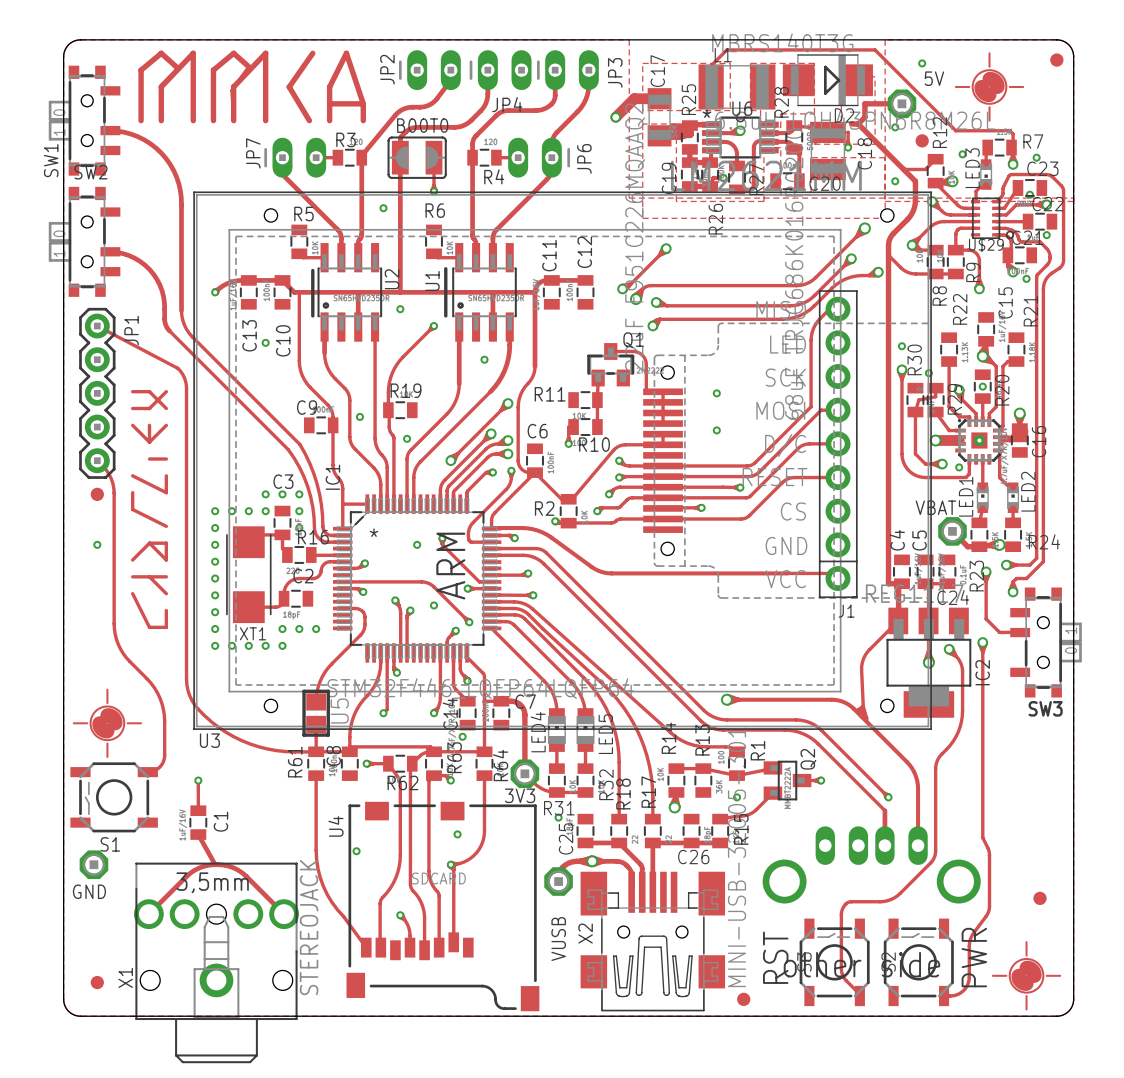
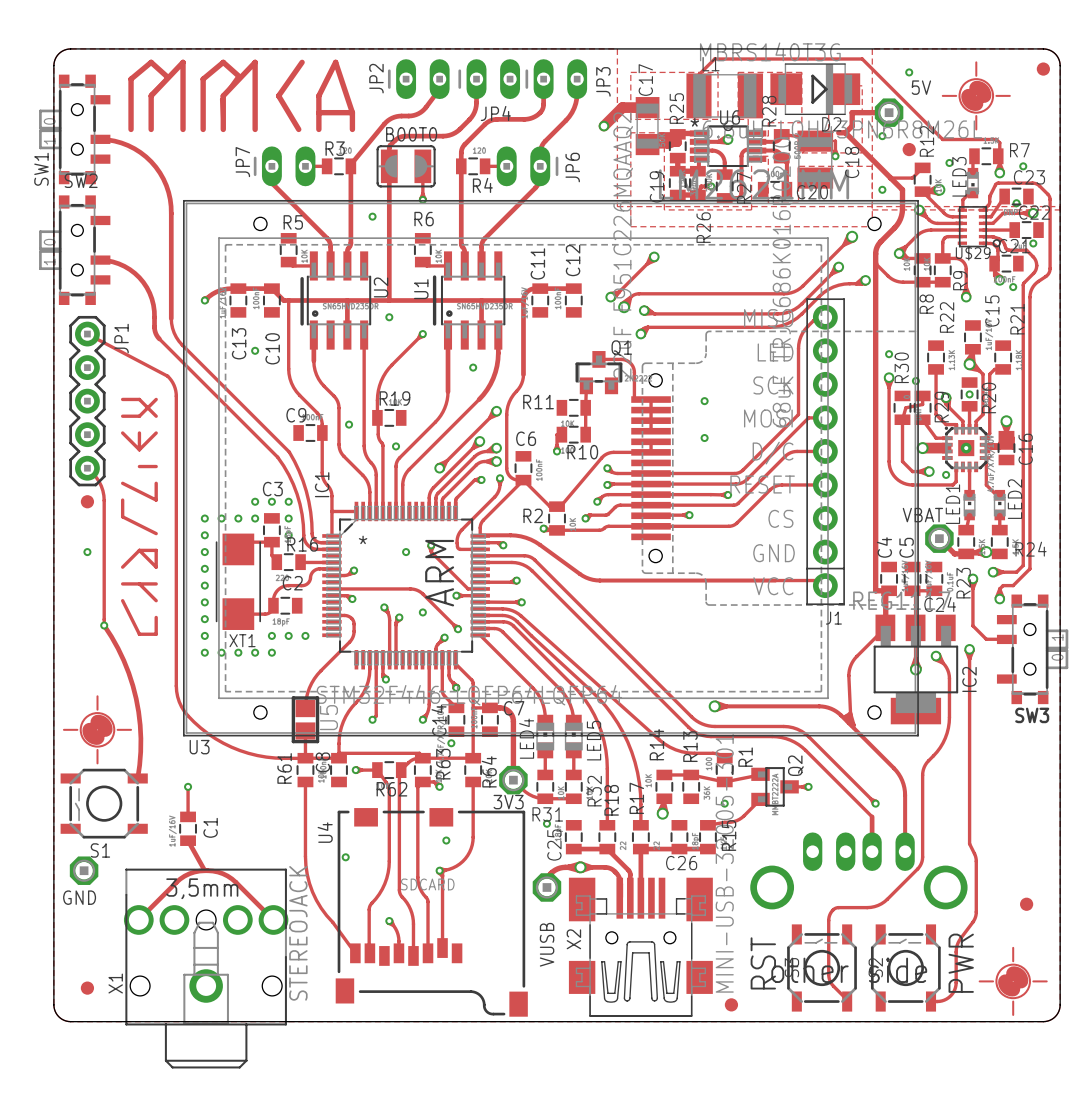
track: (114, 618) (115, 634) (120, 648) (154, 687) (163, 709) (164, 759) (158, 768) (147, 772) -> (104, 625) (123, 660) (136, 698) (140, 738) (137, 778)
via: none -> (104, 625)

